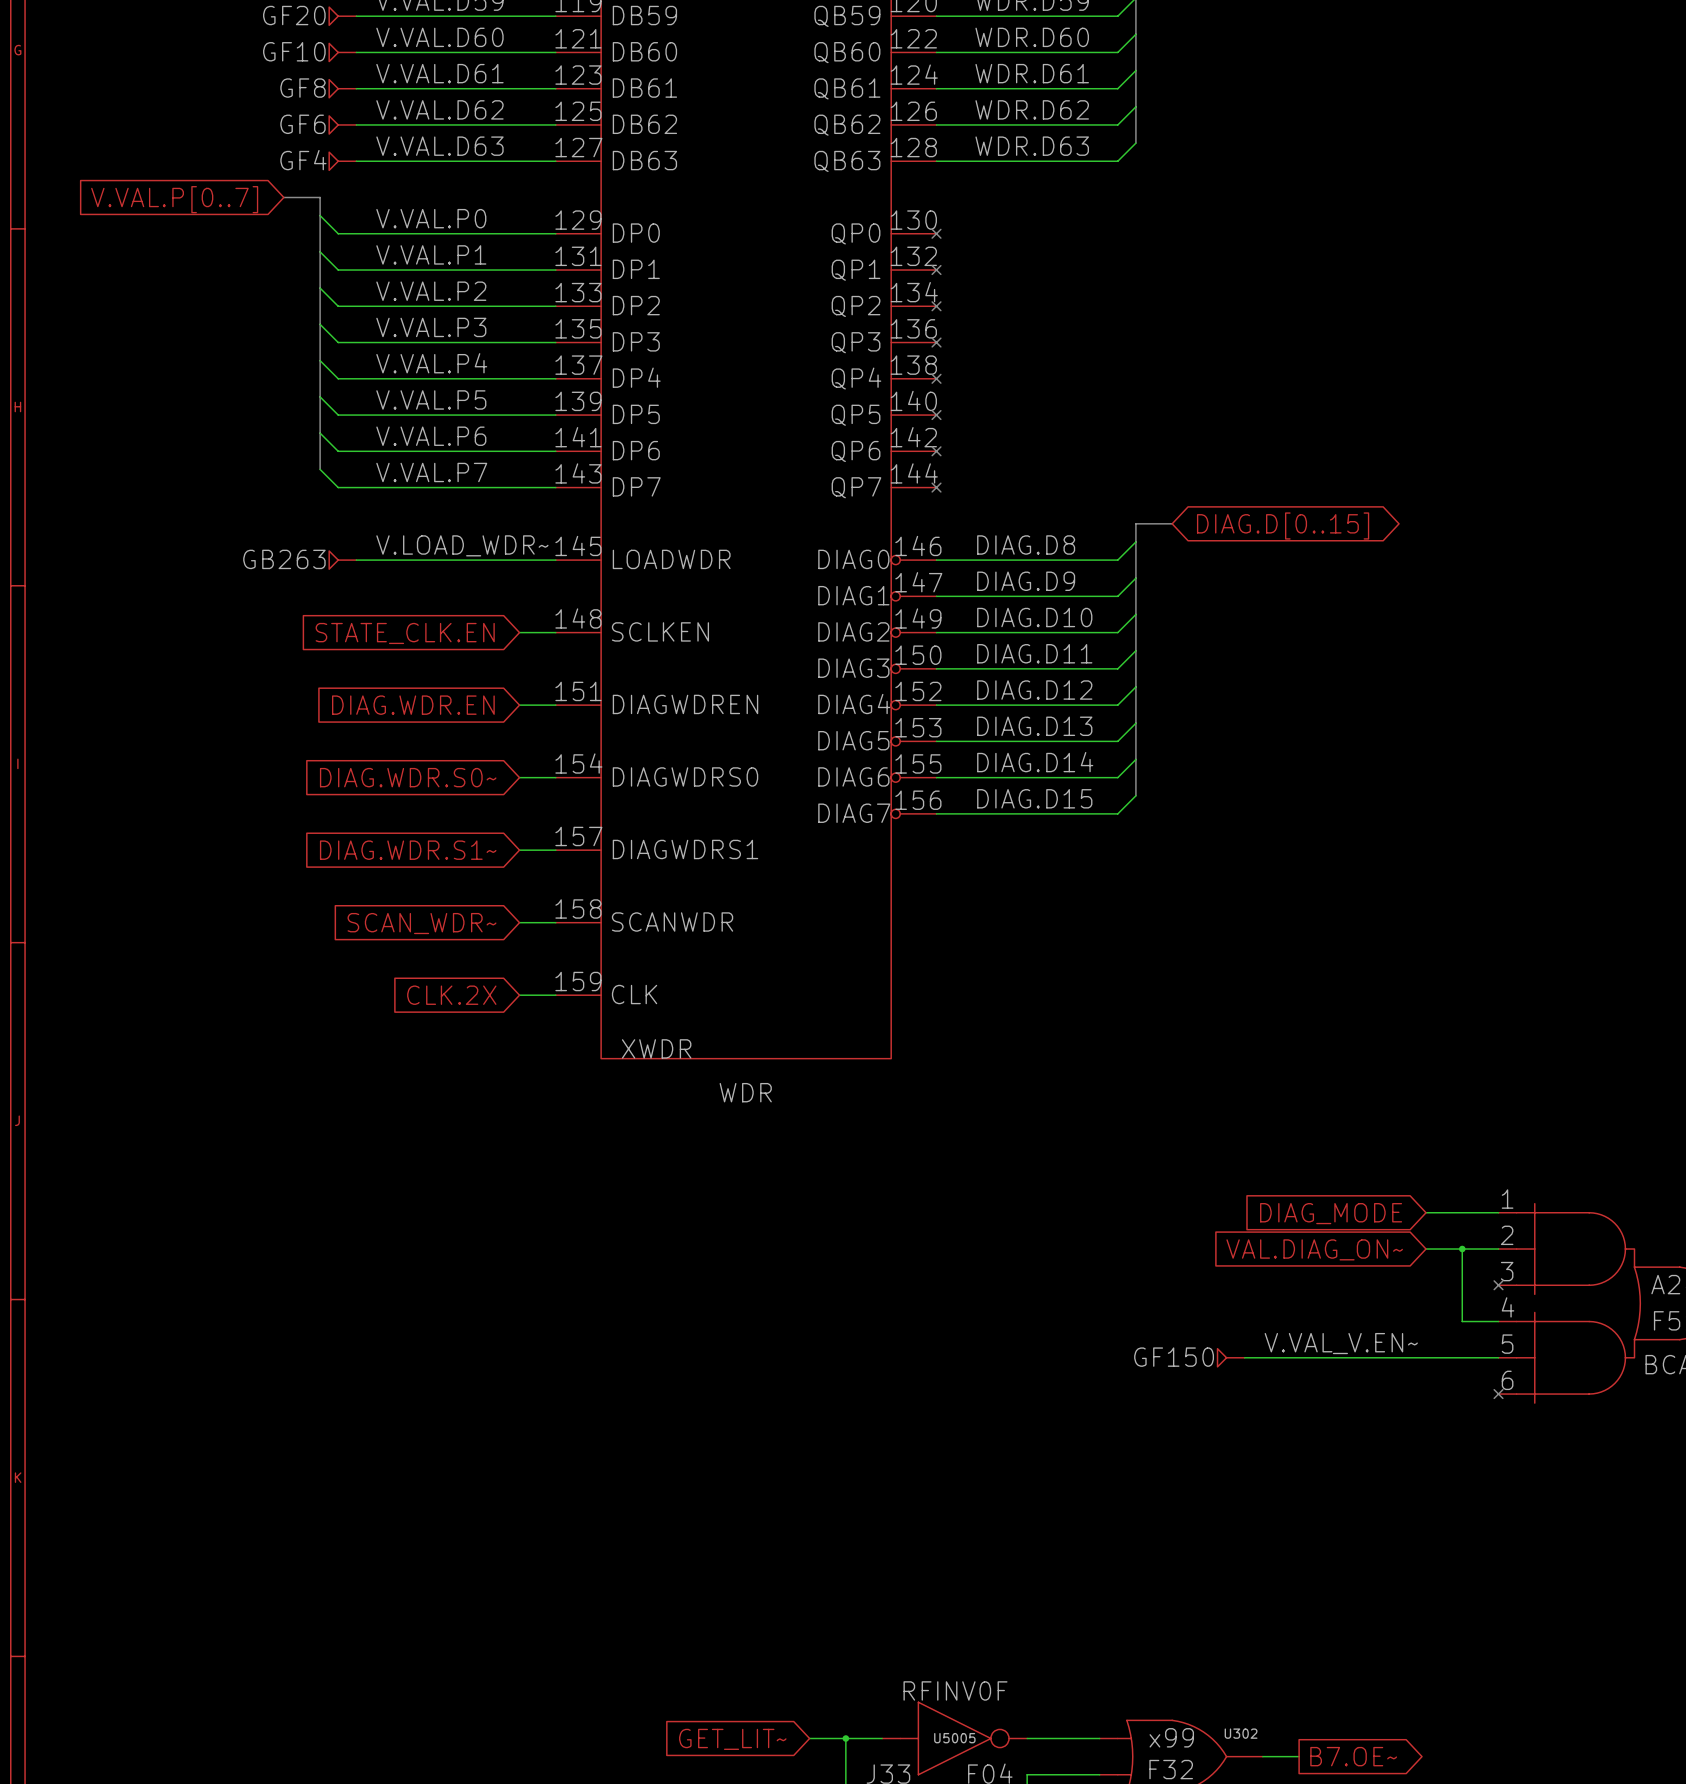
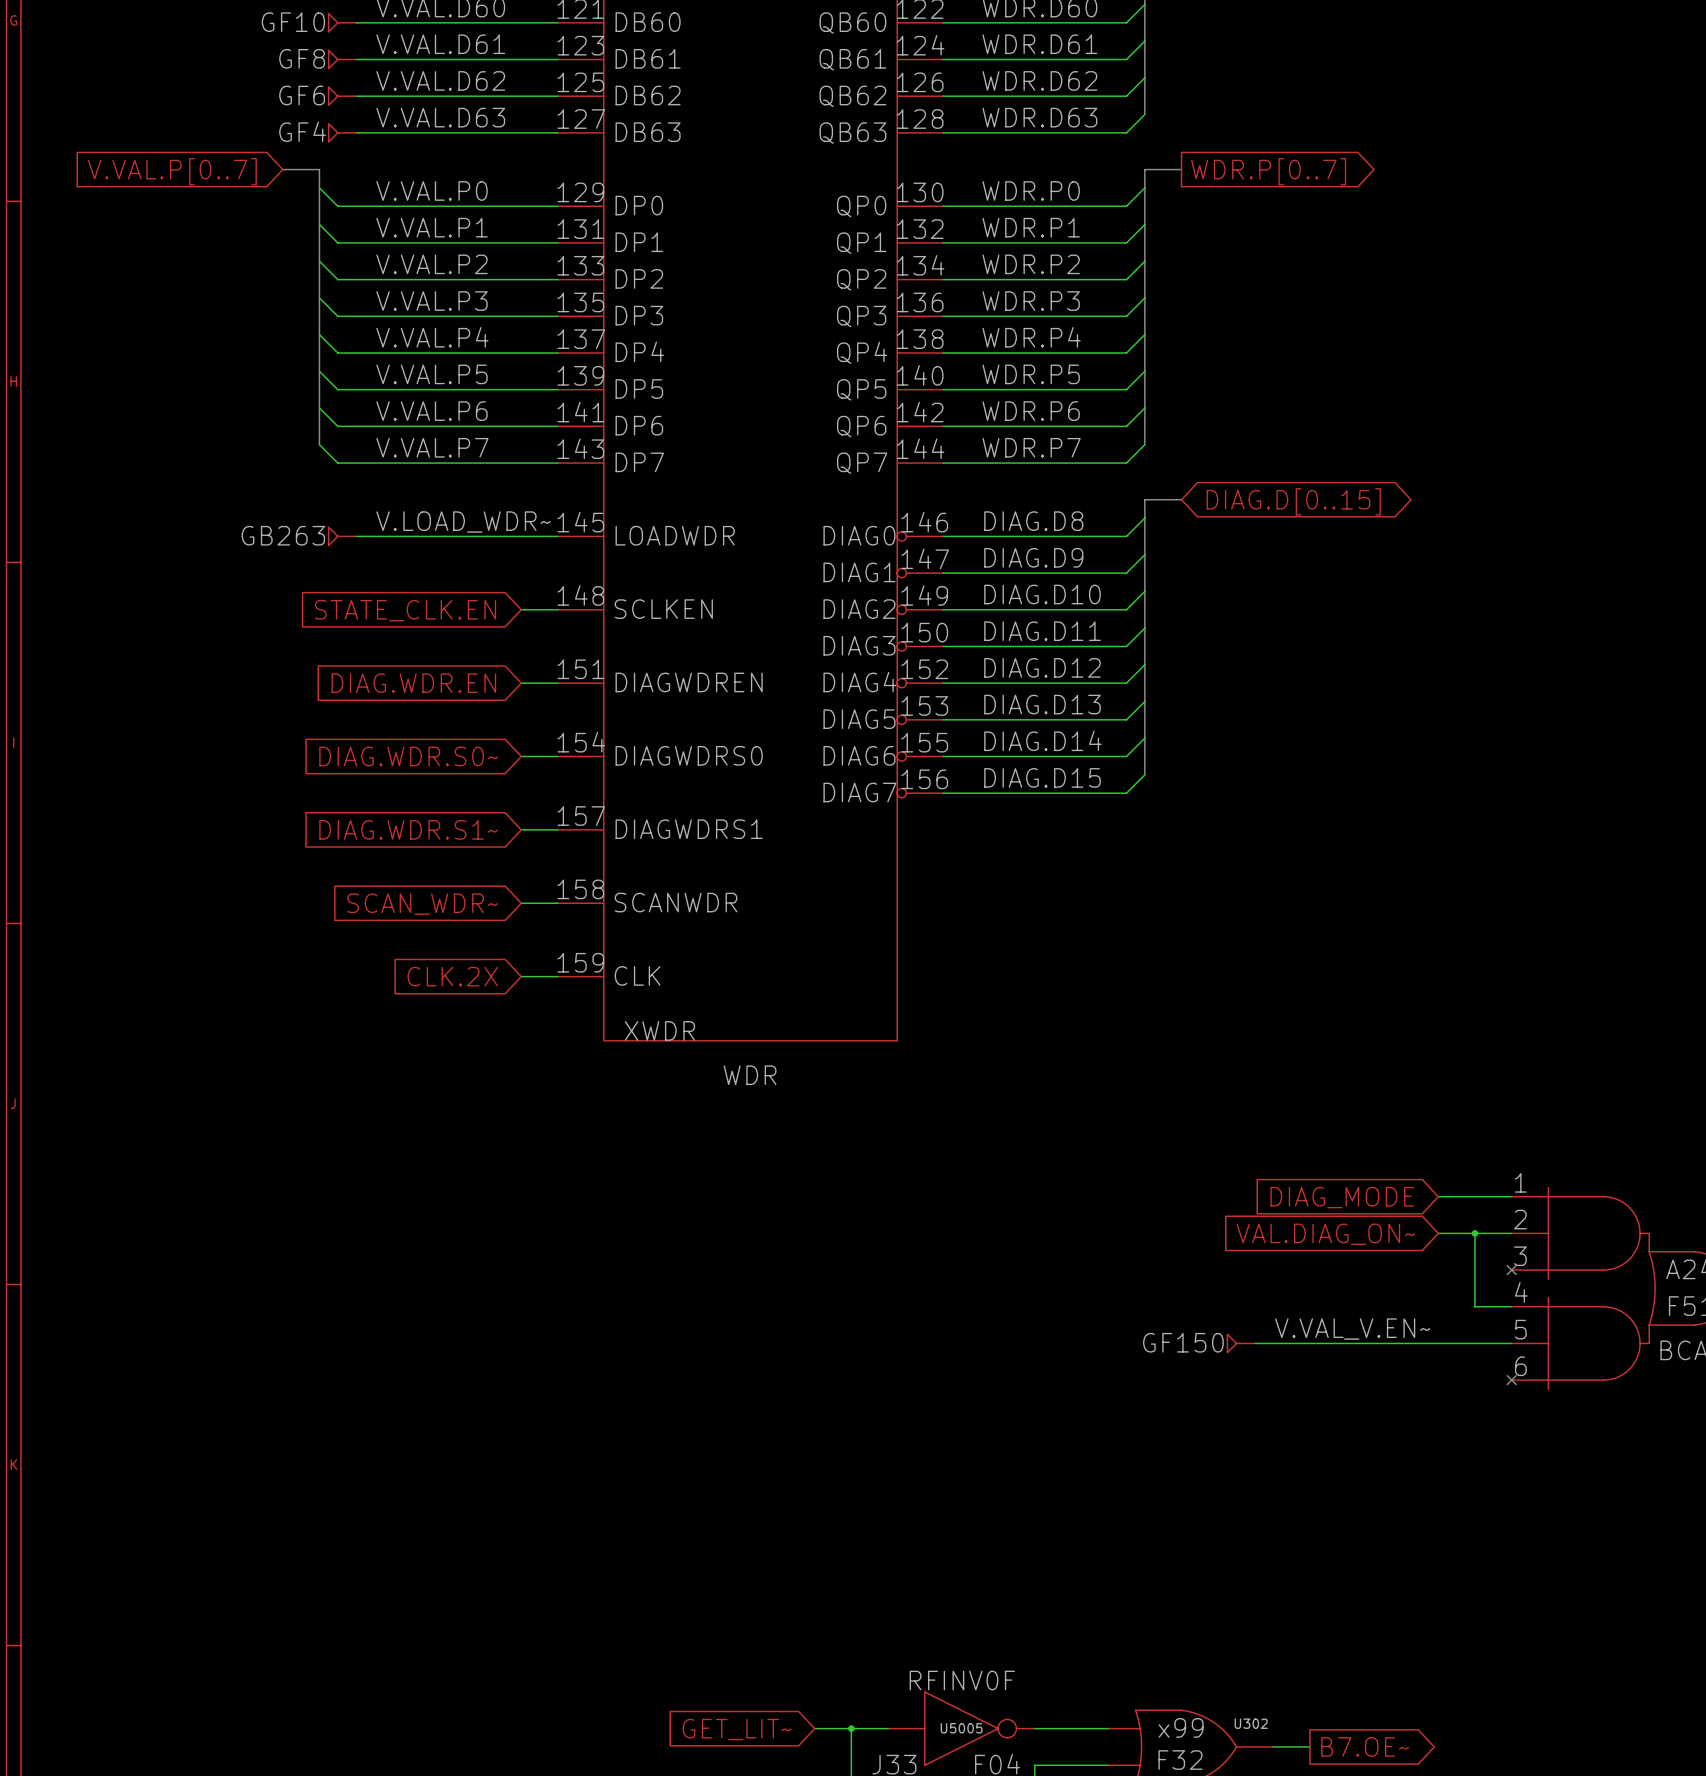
bus: none -> (1181, 169) (1144, 169) (1144, 444)
global label: none -> WDR.P[0..7] (1268, 171)
wire: none -> (1144, 187) (1126, 206) (943, 206)
label: none -> WDR.P0 (1031, 190)
no-connect mark: (936, 233) -> none
wire: none -> (1144, 224) (1126, 242) (943, 242)
label: none -> WDR.P1 (1031, 227)
no-connect mark: (936, 270) -> none
wire: none -> (1144, 261) (1126, 279) (943, 279)
label: none -> WDR.P2 (1031, 264)
no-connect mark: (936, 306) -> none
wire: none -> (1144, 297) (1126, 316) (943, 316)
label: none -> WDR.P3 (1031, 301)
no-connect mark: (936, 342) -> none
wire: none -> (1144, 334) (1126, 352) (943, 352)
label: none -> WDR.P4 (1031, 337)
no-connect mark: (936, 378) -> none
wire: none -> (1144, 371) (1126, 389) (943, 389)
label: none -> WDR.P5 (1031, 374)
no-connect mark: (936, 415) -> none
wire: none -> (1144, 408) (1126, 426) (943, 426)
label: none -> WDR.P6 (1031, 411)
no-connect mark: (936, 451) -> none
wire: none -> (1144, 444) (1126, 463) (943, 463)
label: none -> WDR.P7 (1031, 447)
no-connect mark: (936, 487) -> none

